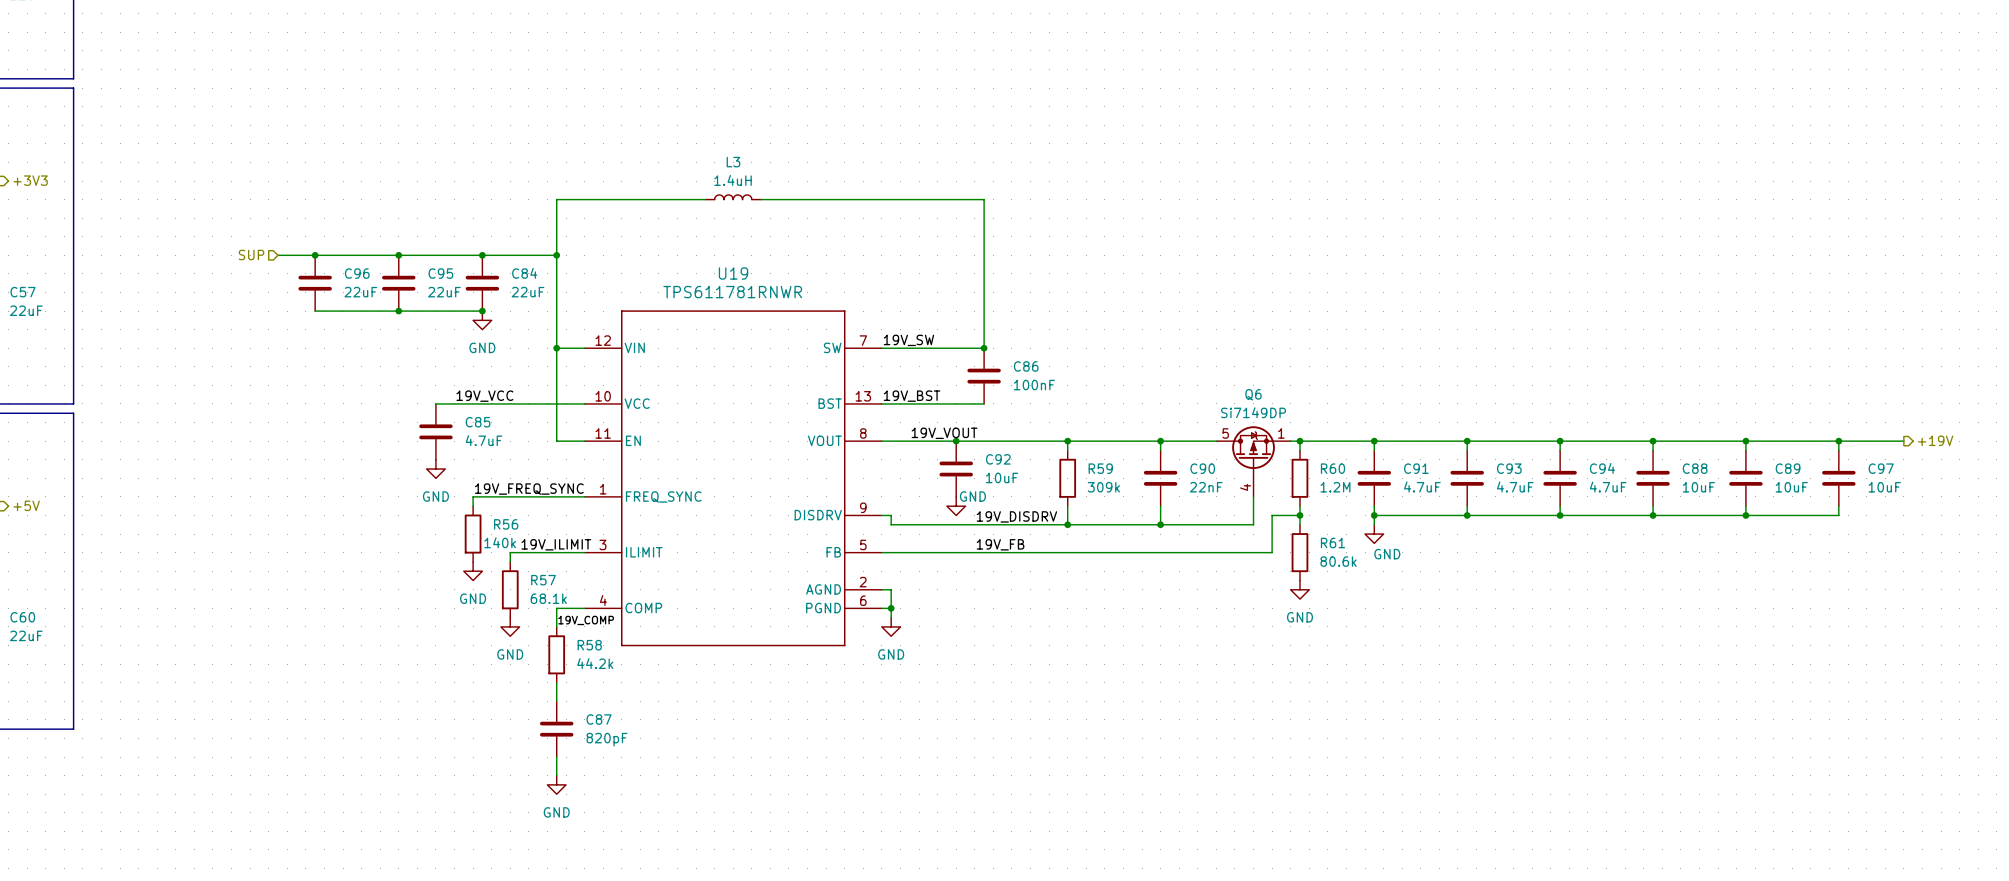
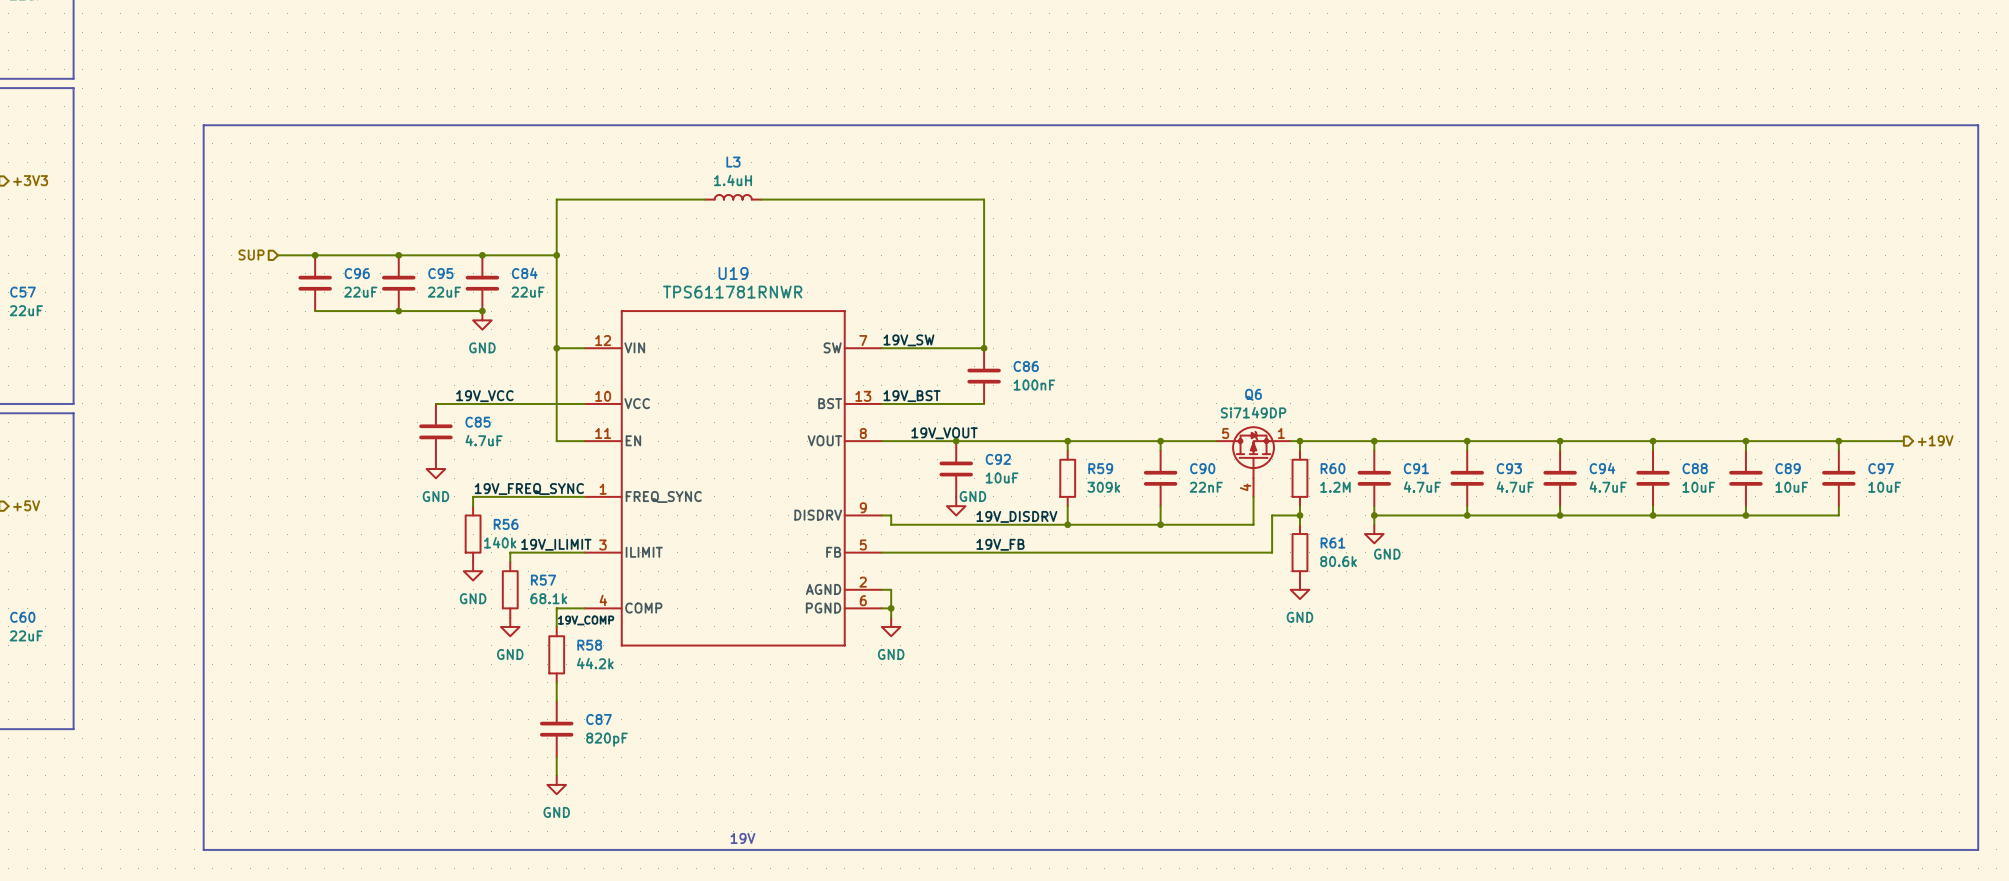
line: none -> (203, 125) (1978, 125) (1978, 849) (203, 849) (203, 125)
text: none -> 19V (742, 838)

